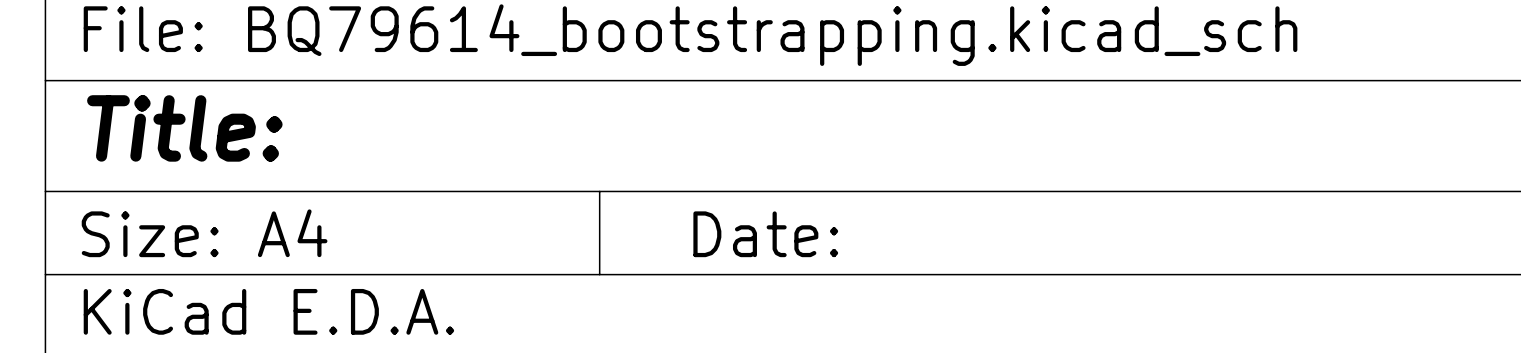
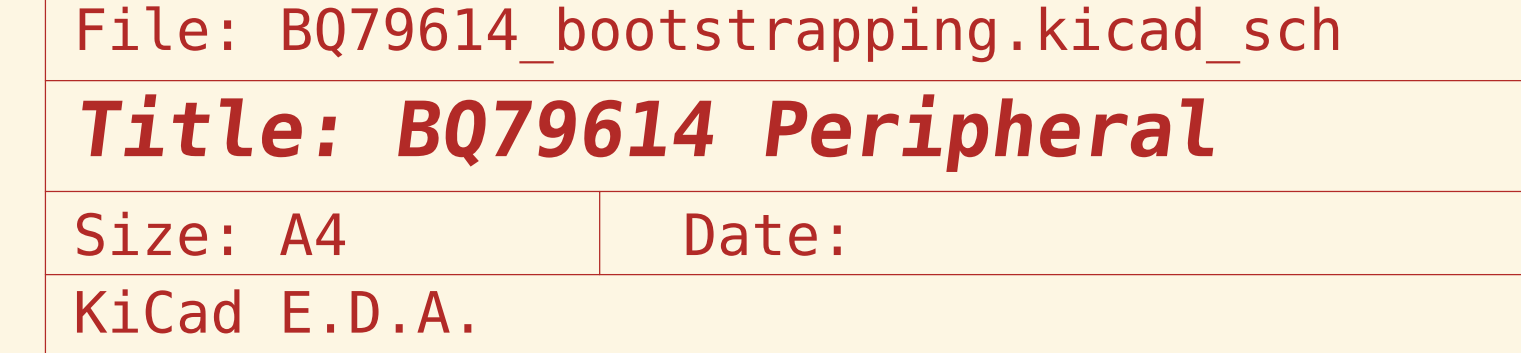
title block: Title: (184, 128) -> Title: BQ79614 Peripheral (647, 133)

